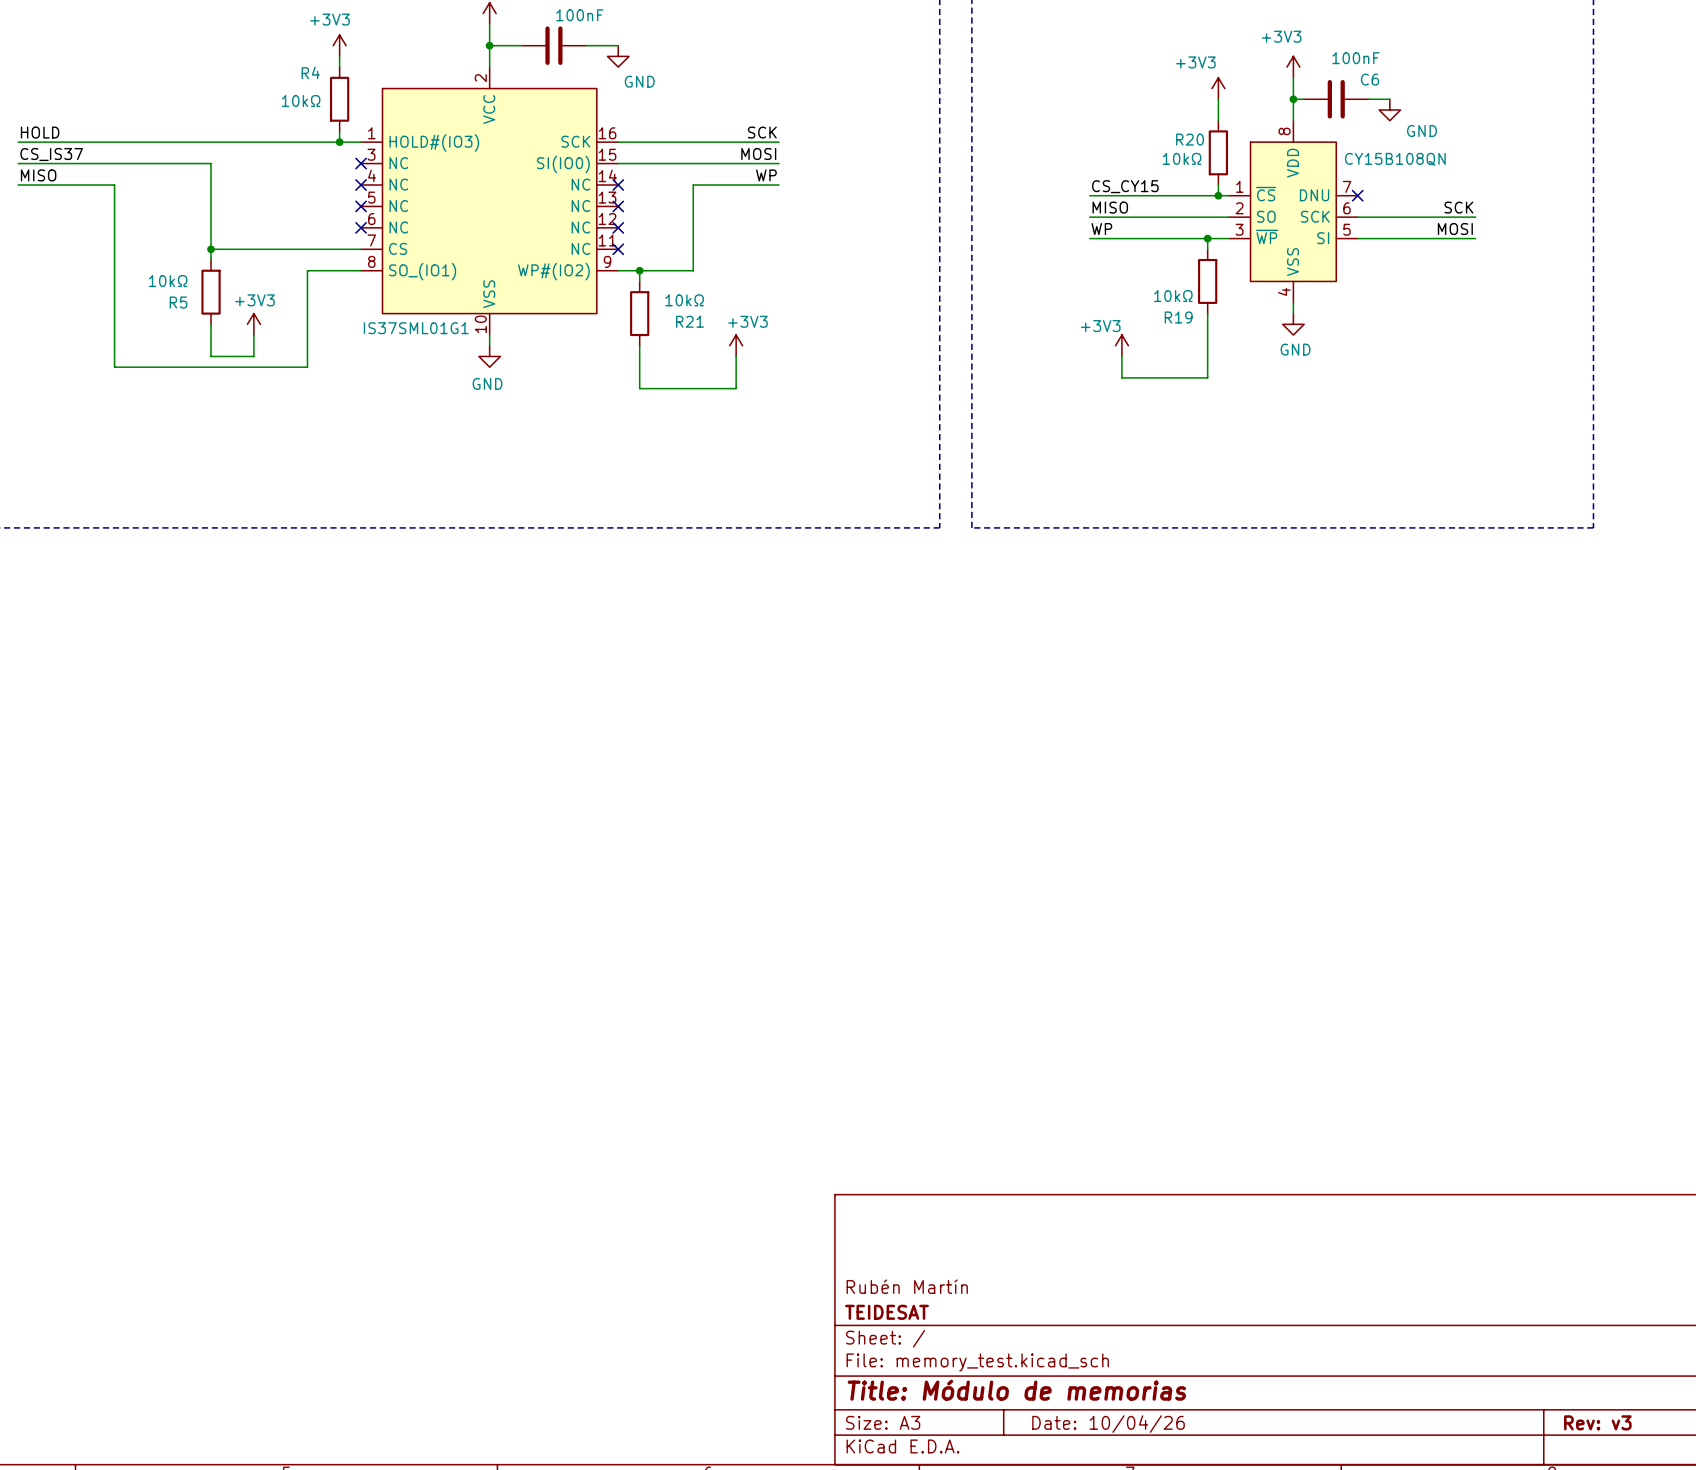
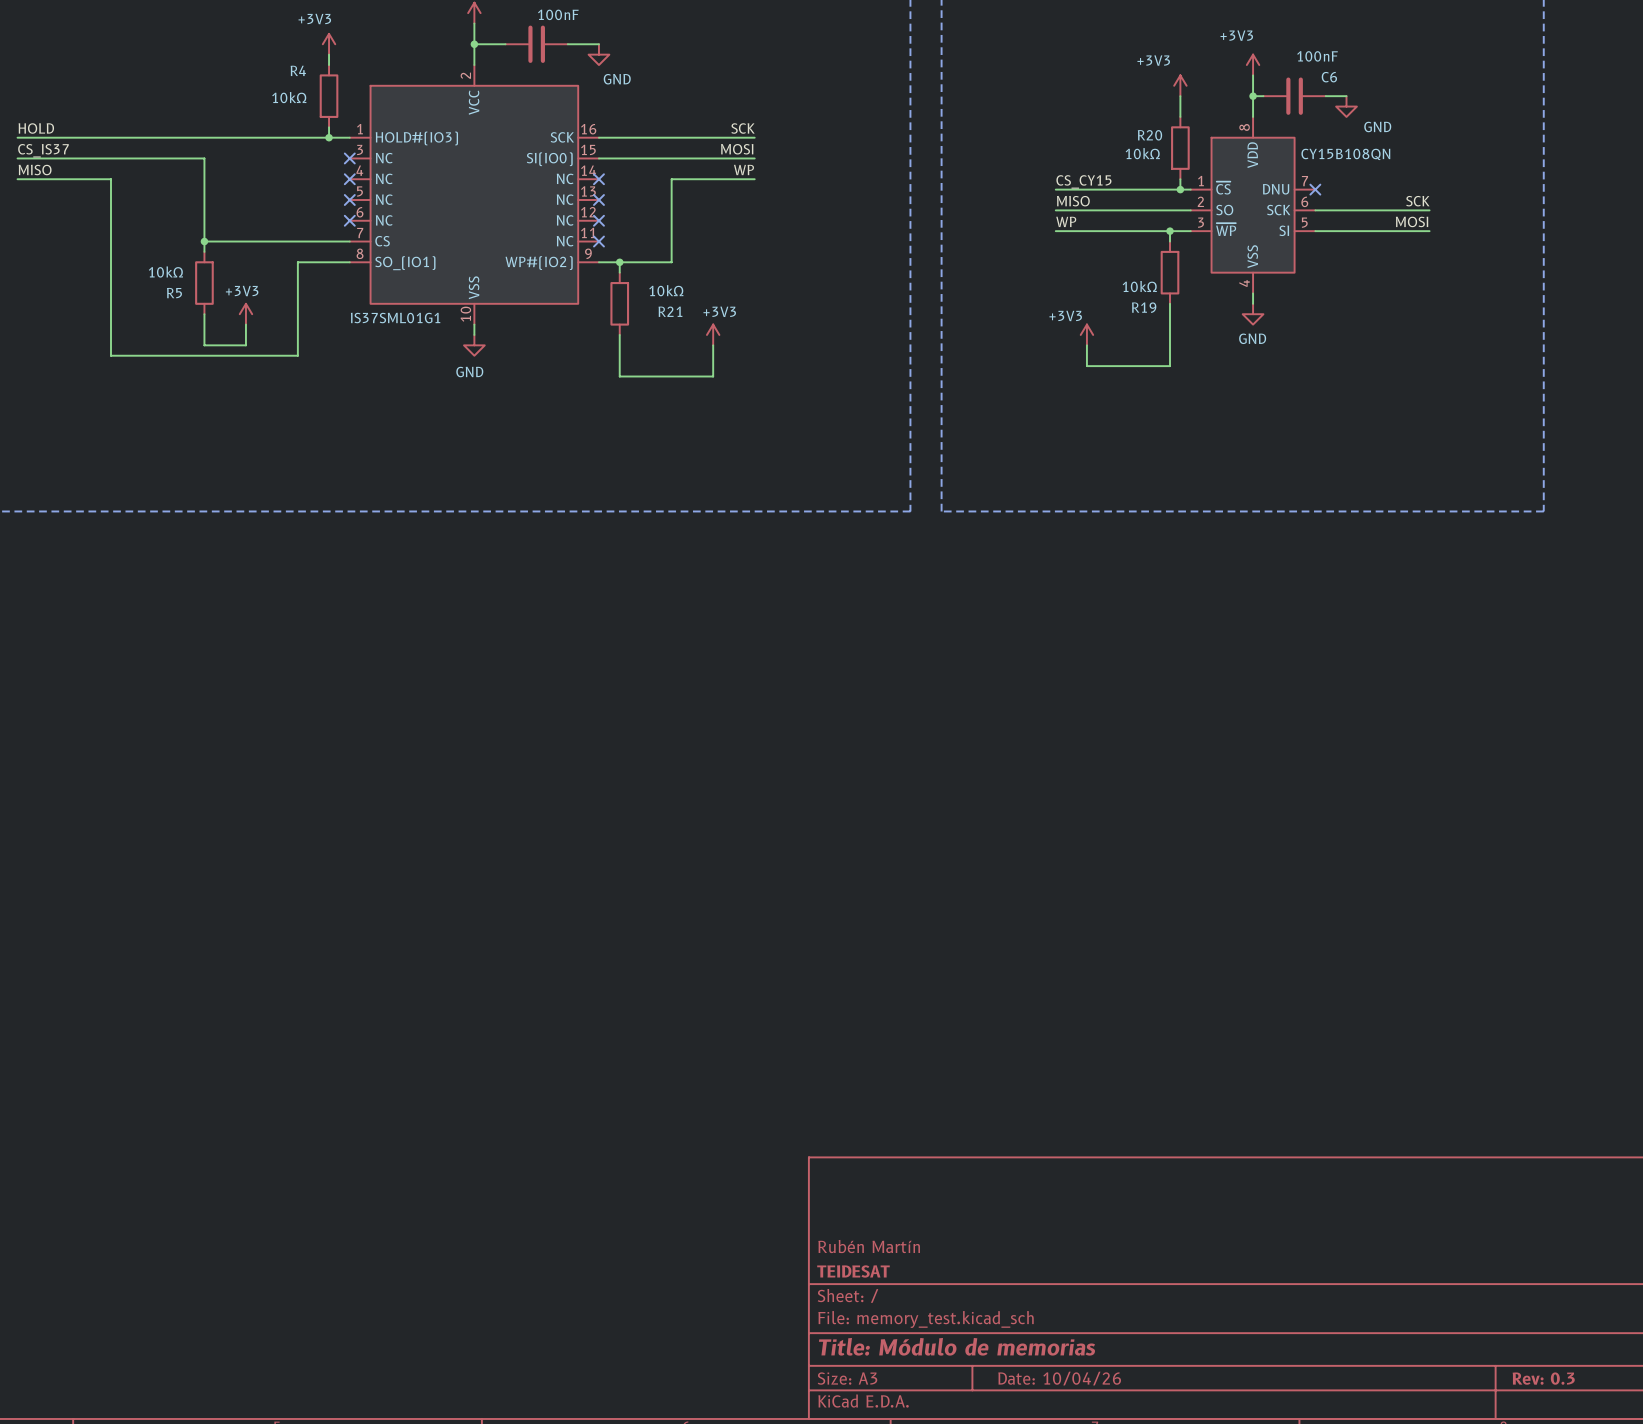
title block: Rev: v3 (1597, 1422) -> Rev: 0.3 (1543, 1378)

